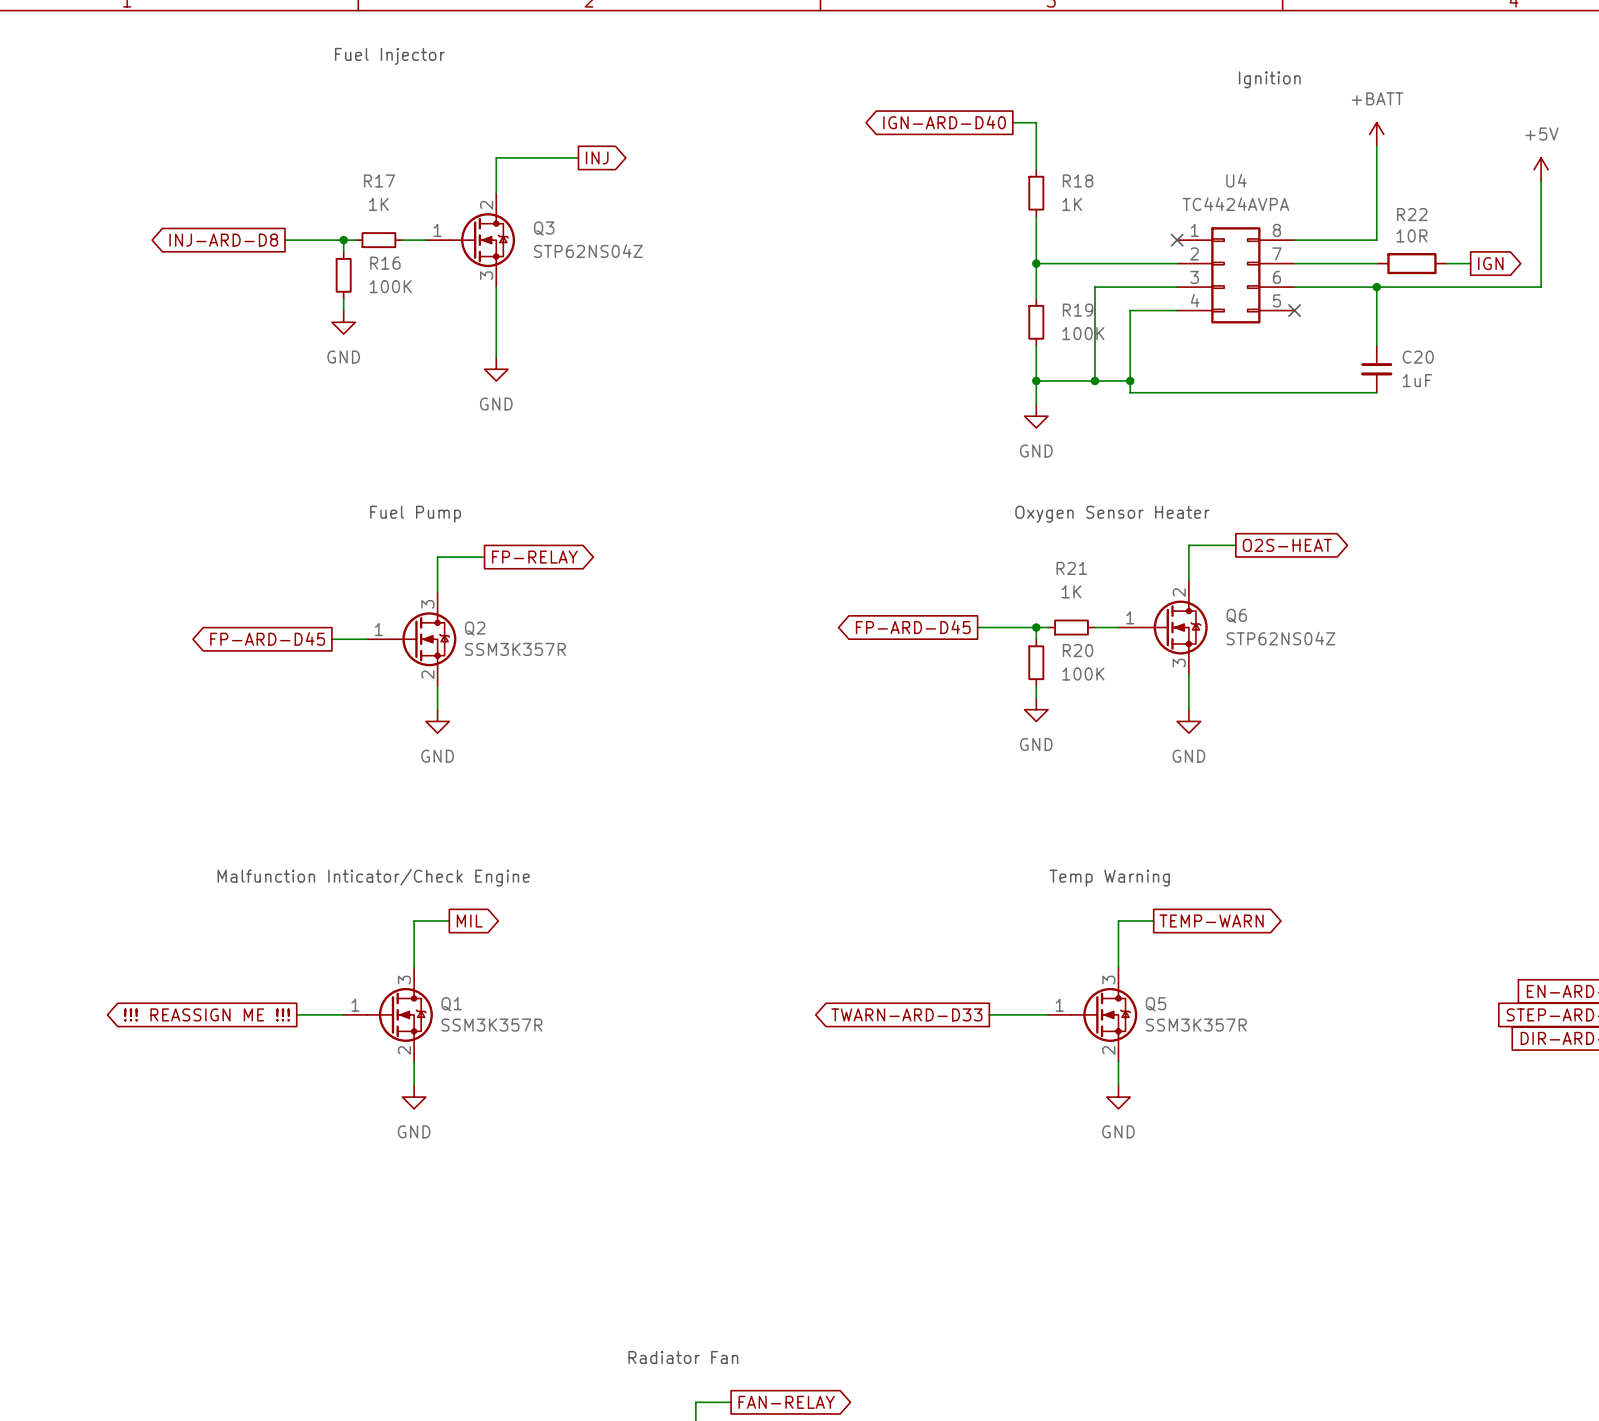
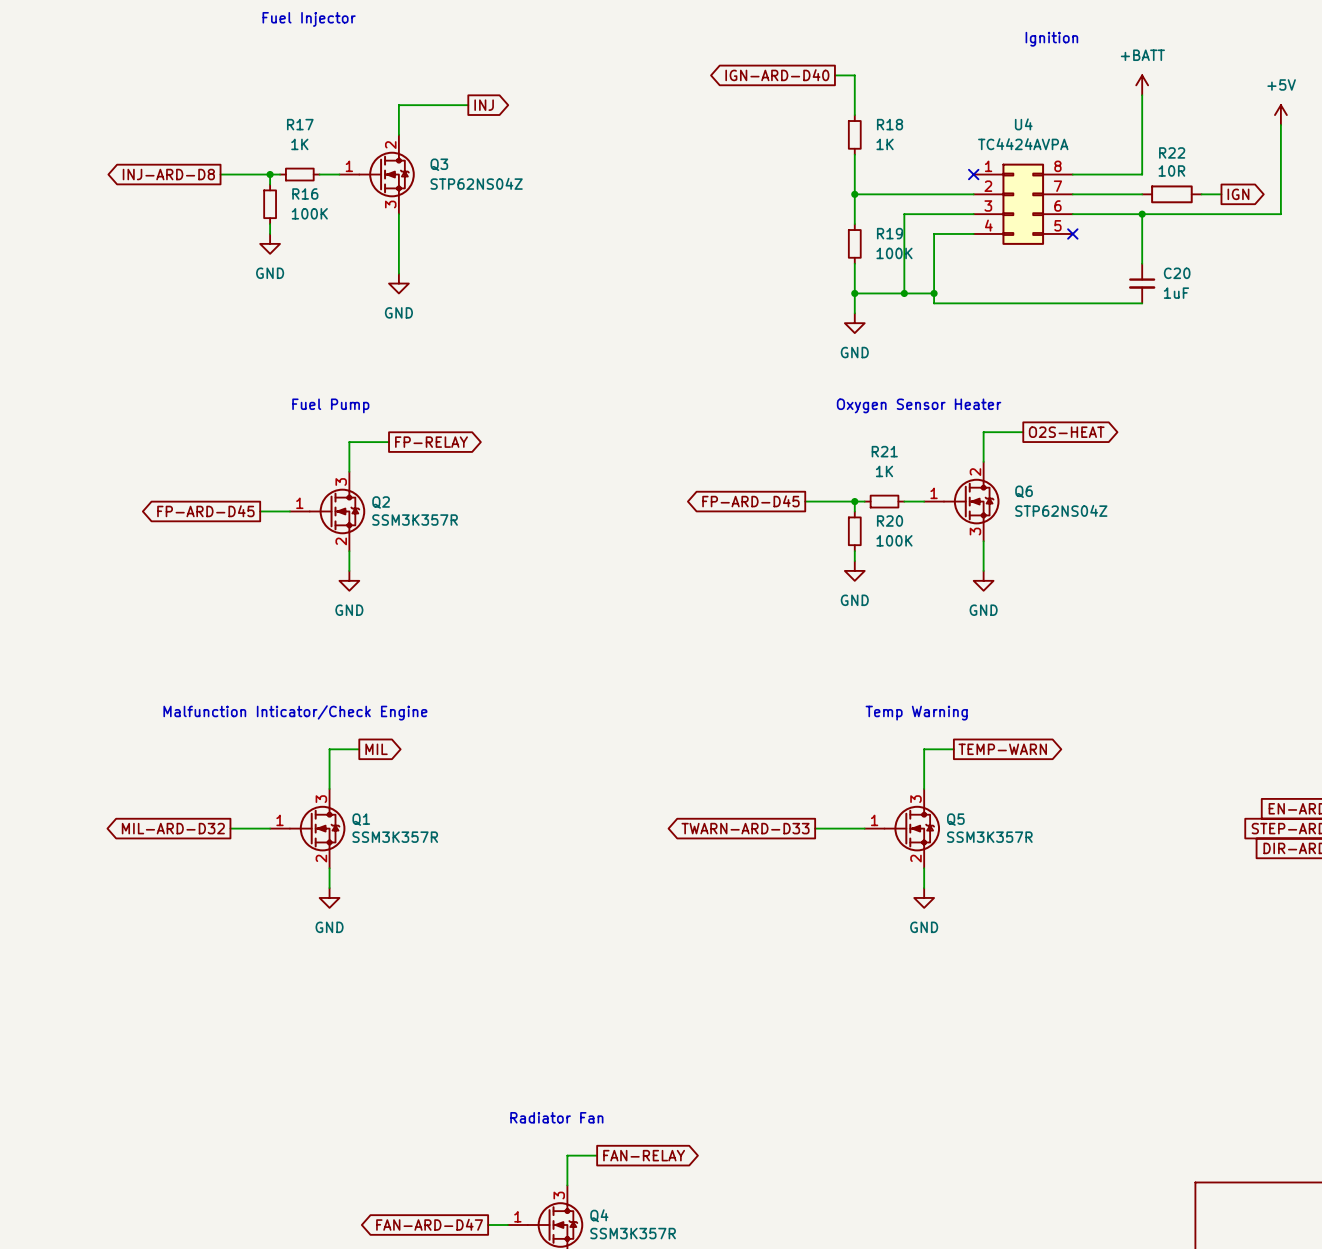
global label: !!! REASSIGN ME !!! (206, 1014) -> MIL-ARD-D32 (173, 828)

